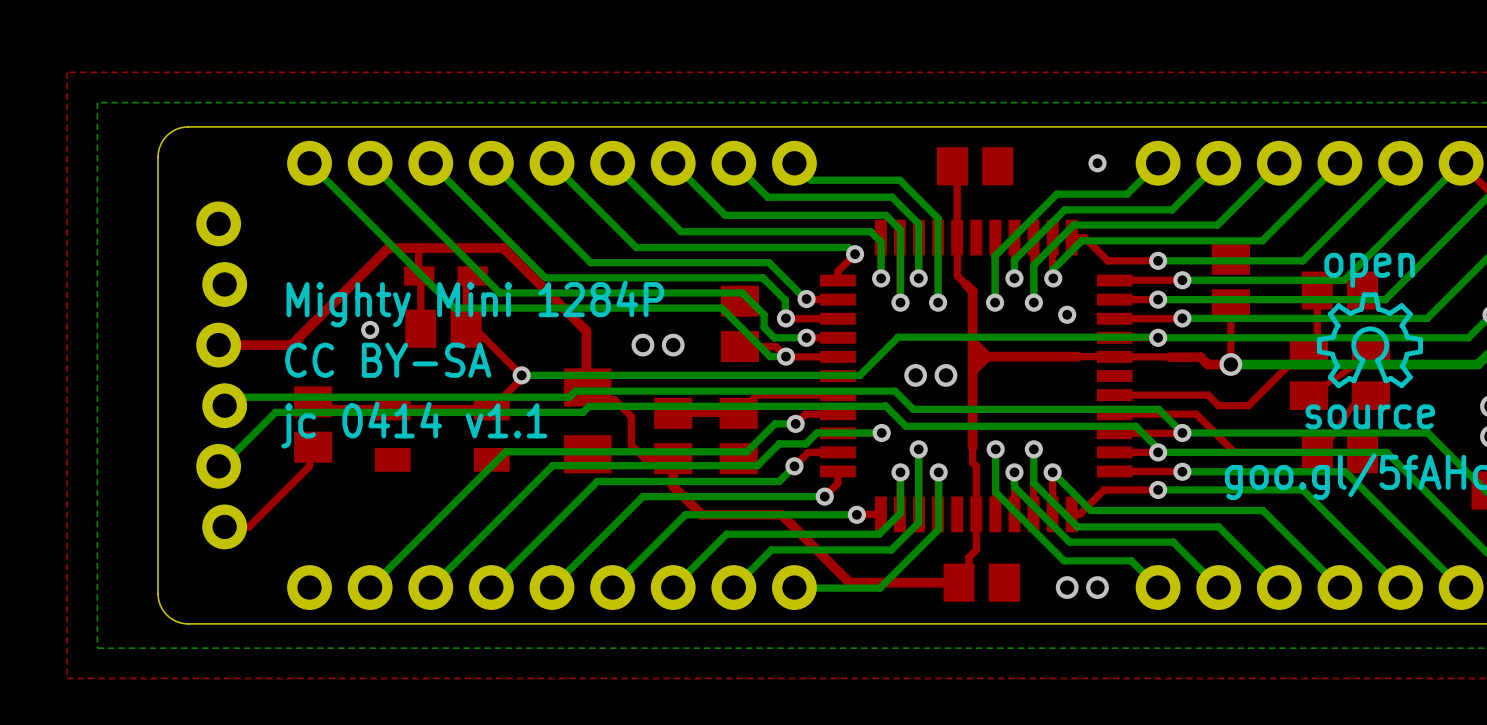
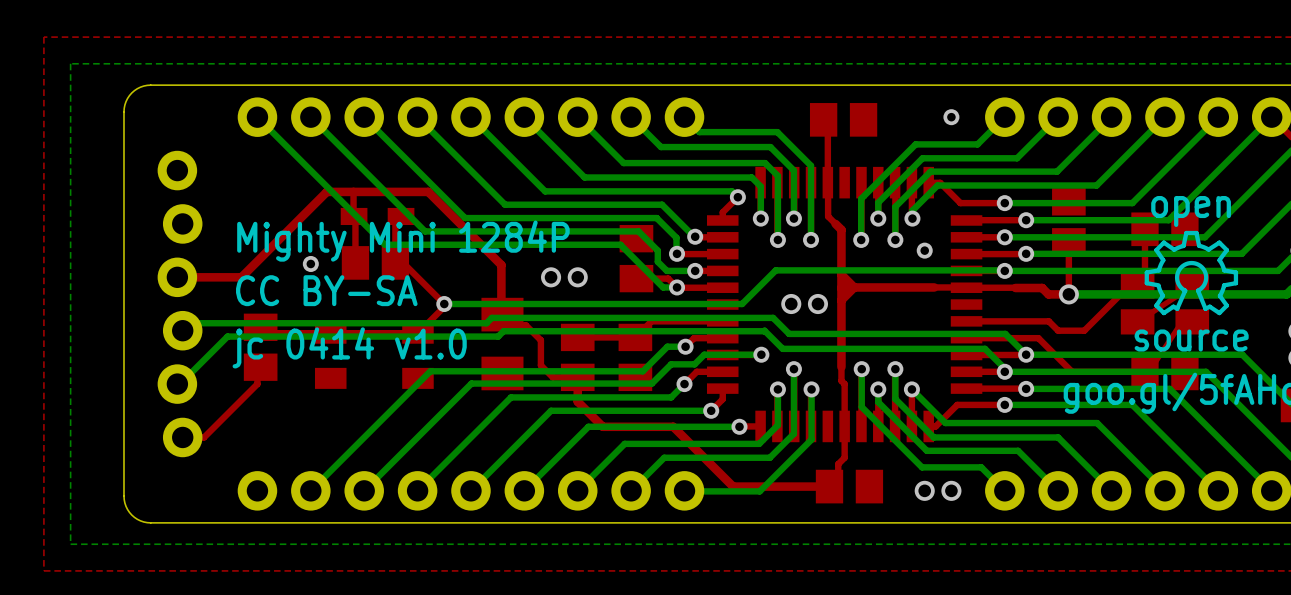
text: jc 0414 v1.1 (414, 425) -> jc 0414 v1.0 (349, 347)

